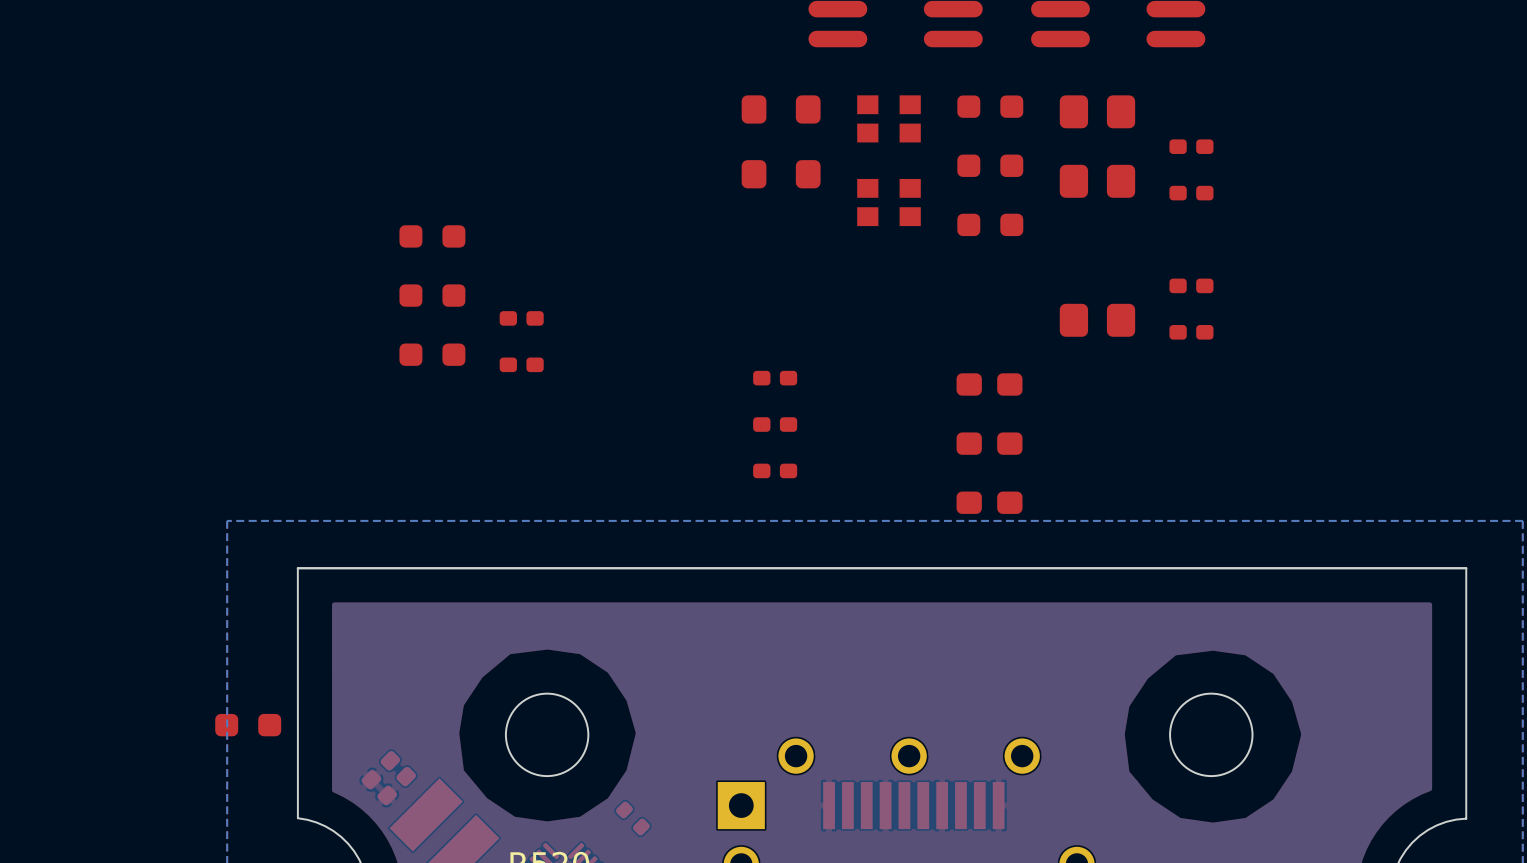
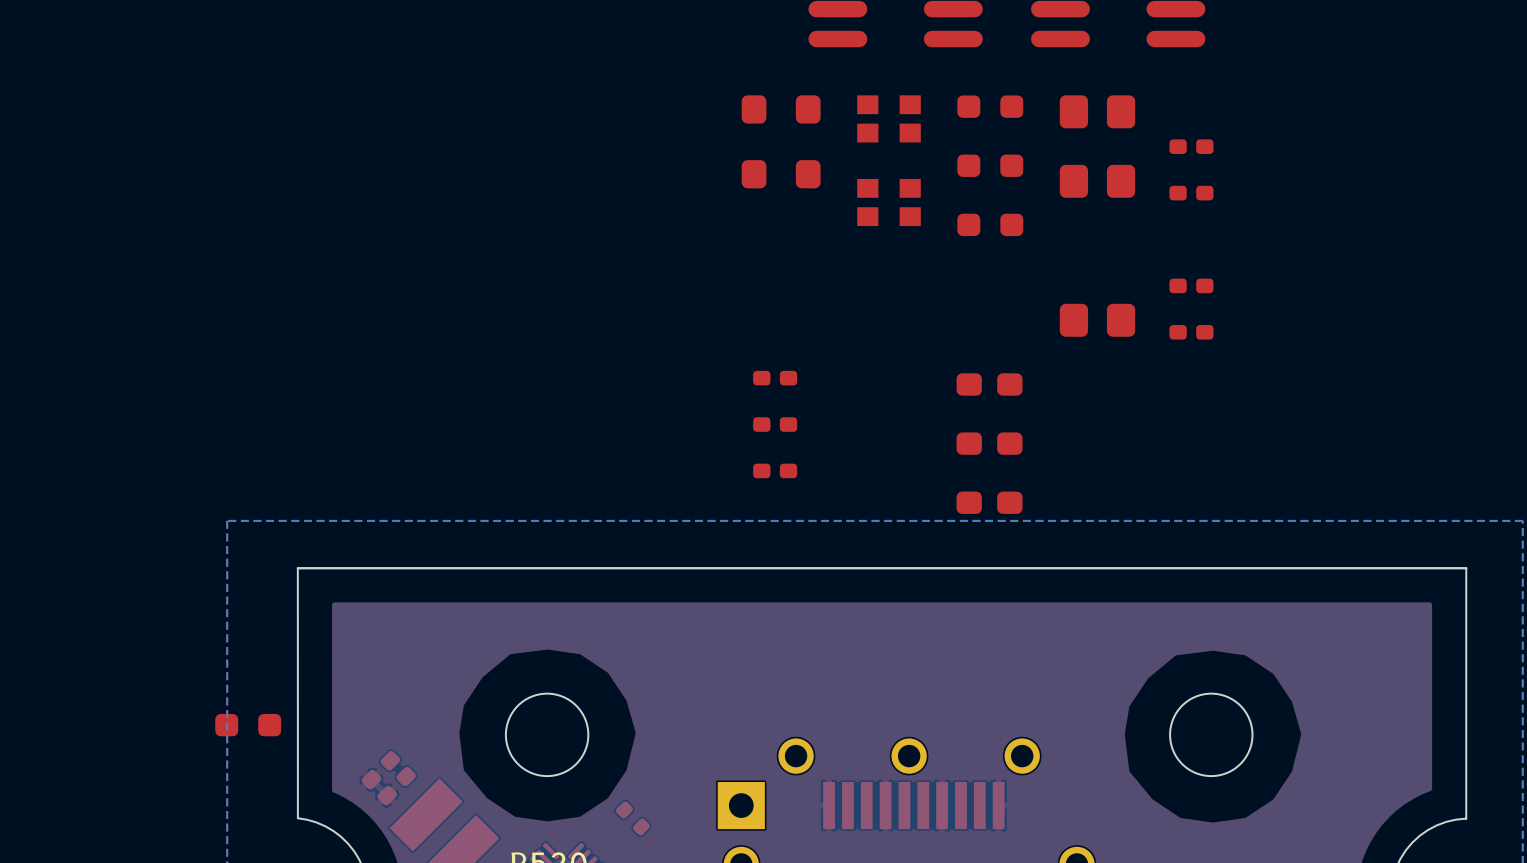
part: (432, 236) -> none
part: (432, 295) -> none
part: (521, 318) -> none
part: (432, 354) -> none
part: (521, 364) -> none

